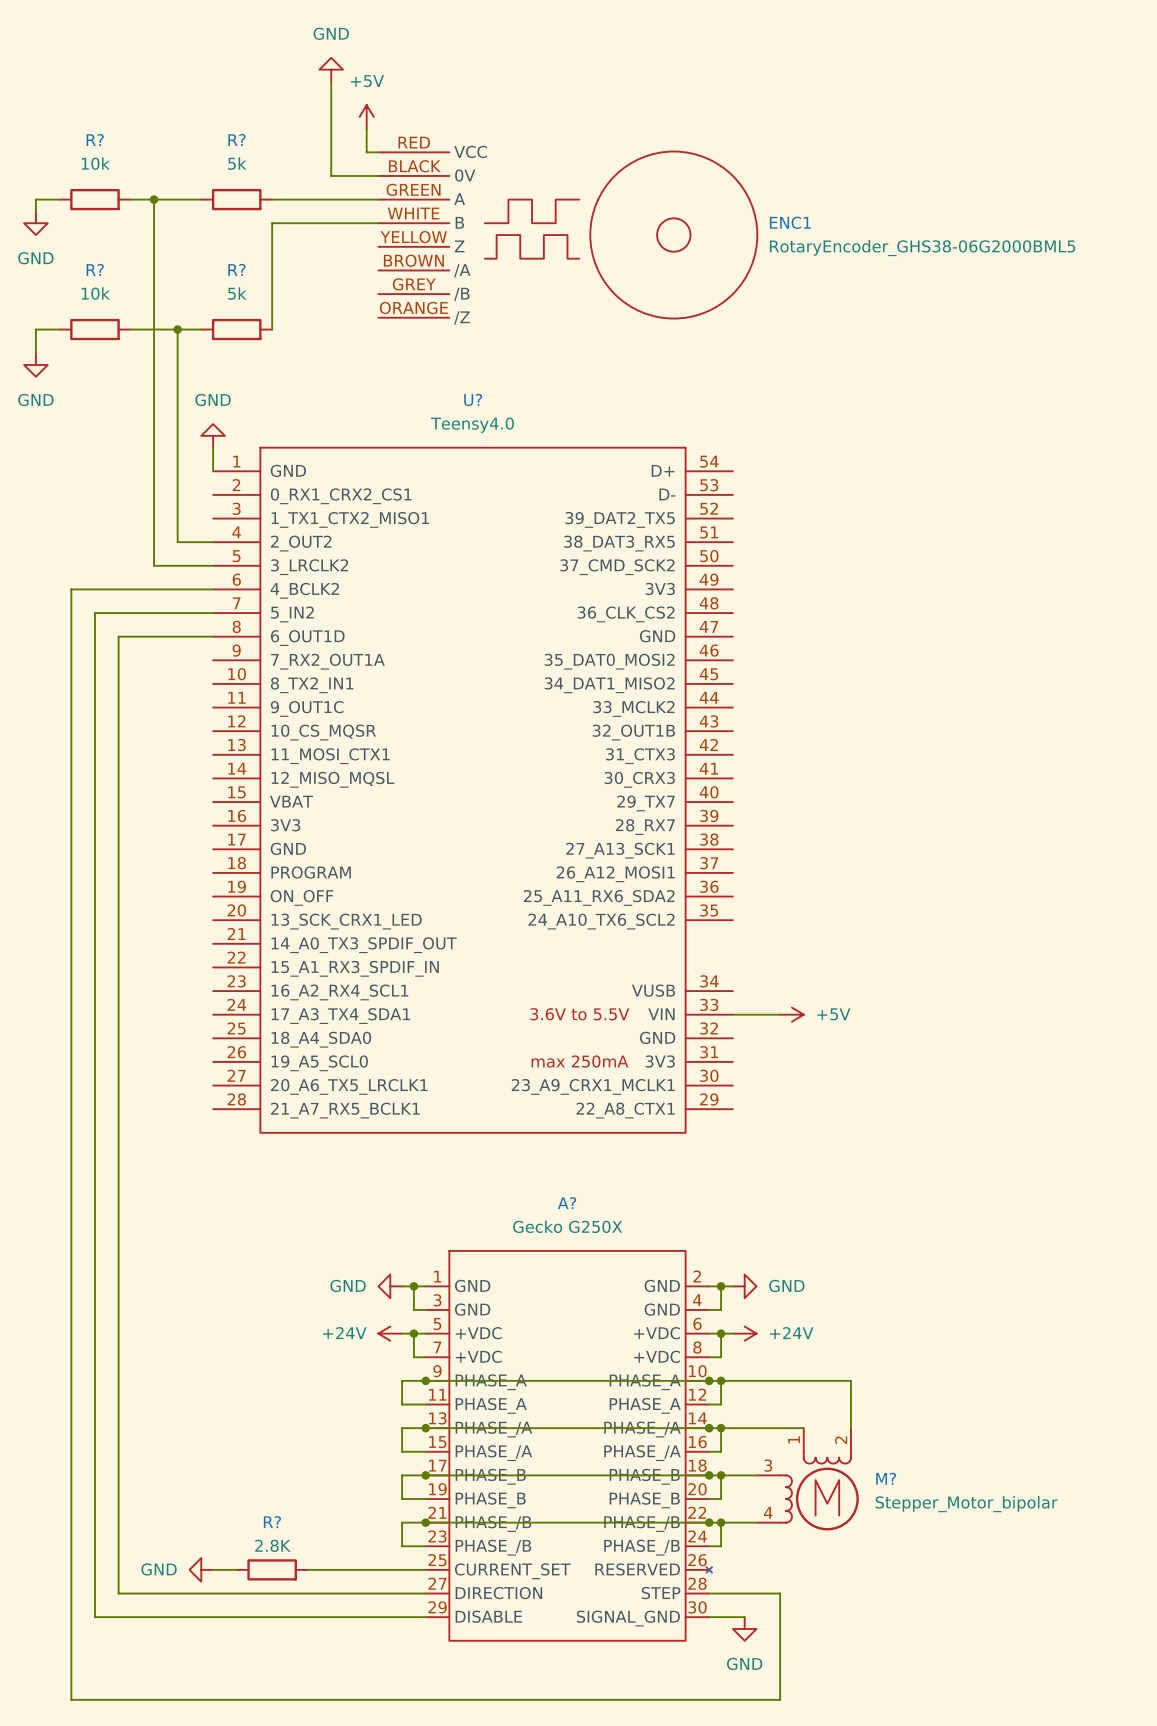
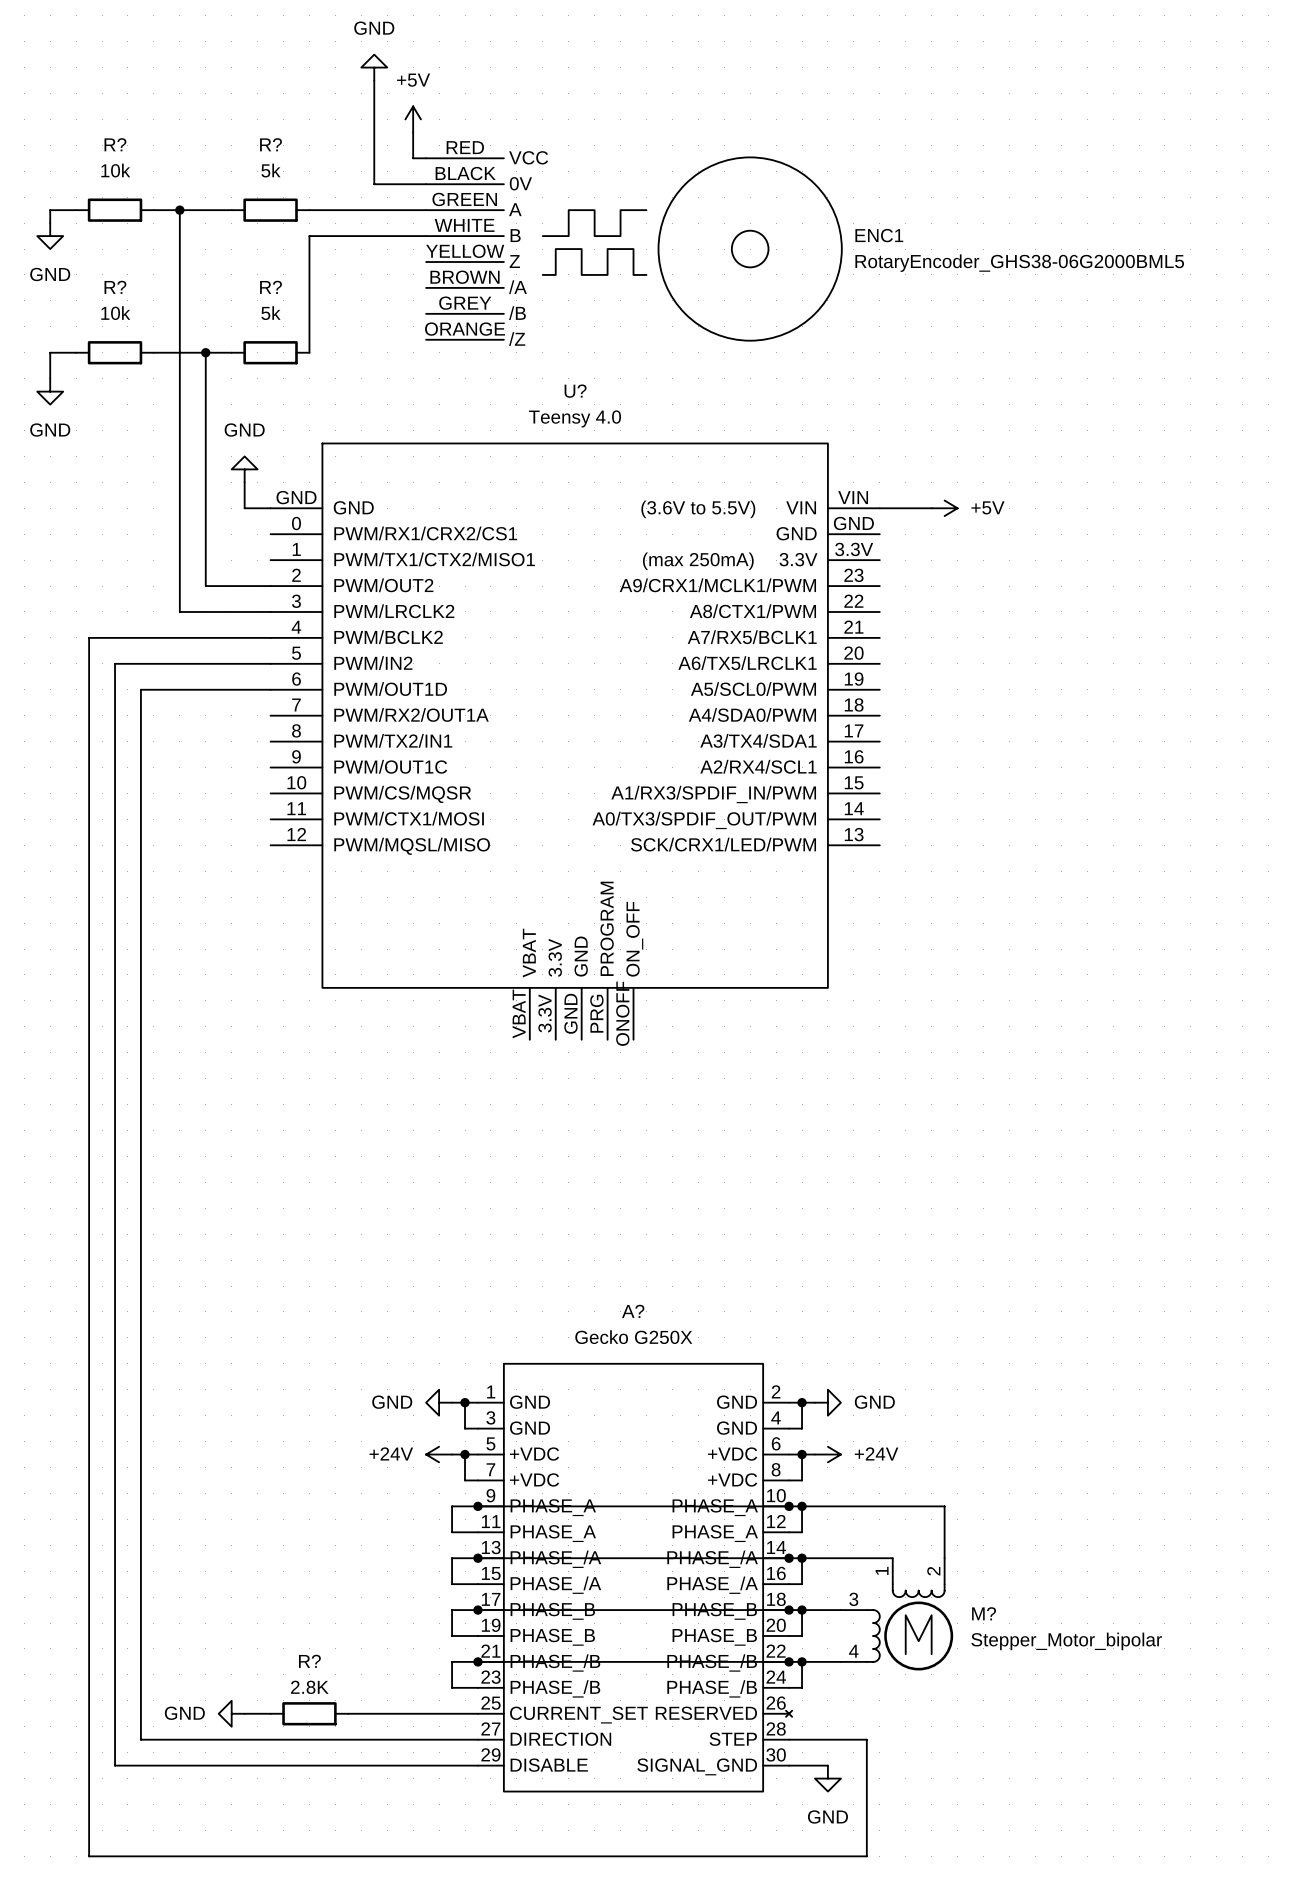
wire: none -> (879, 508) (931, 508)
power symbol: none -> +5V (944, 508)
U?: none -> Teensy 4.0 (575, 741)
U?: Teensy4.0 (472, 790) -> none
wire: (732, 1014) (780, 1014) -> none
power symbol: +5V (791, 1014) -> none

